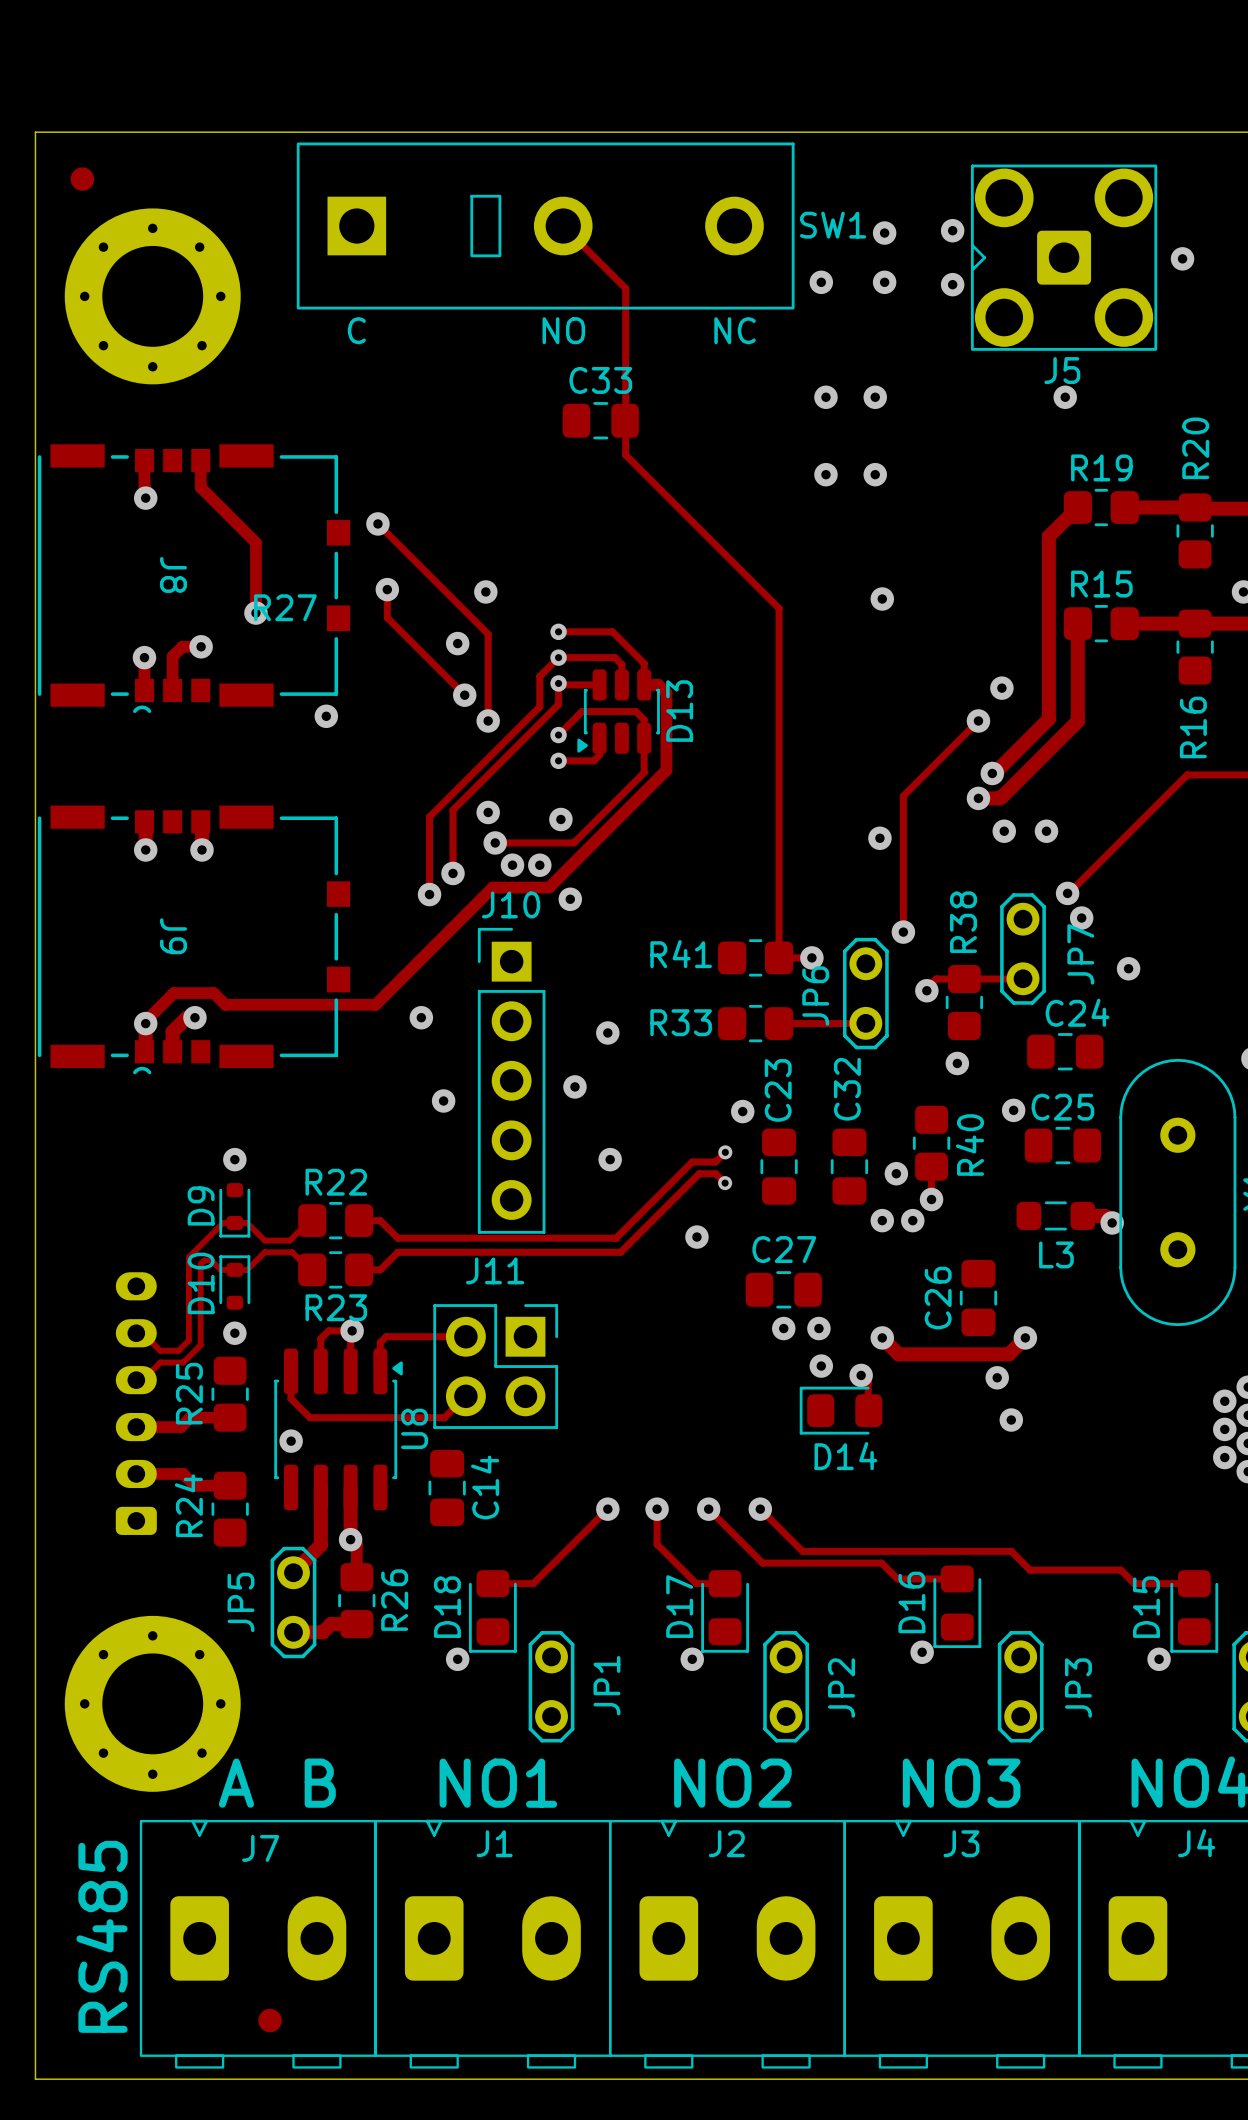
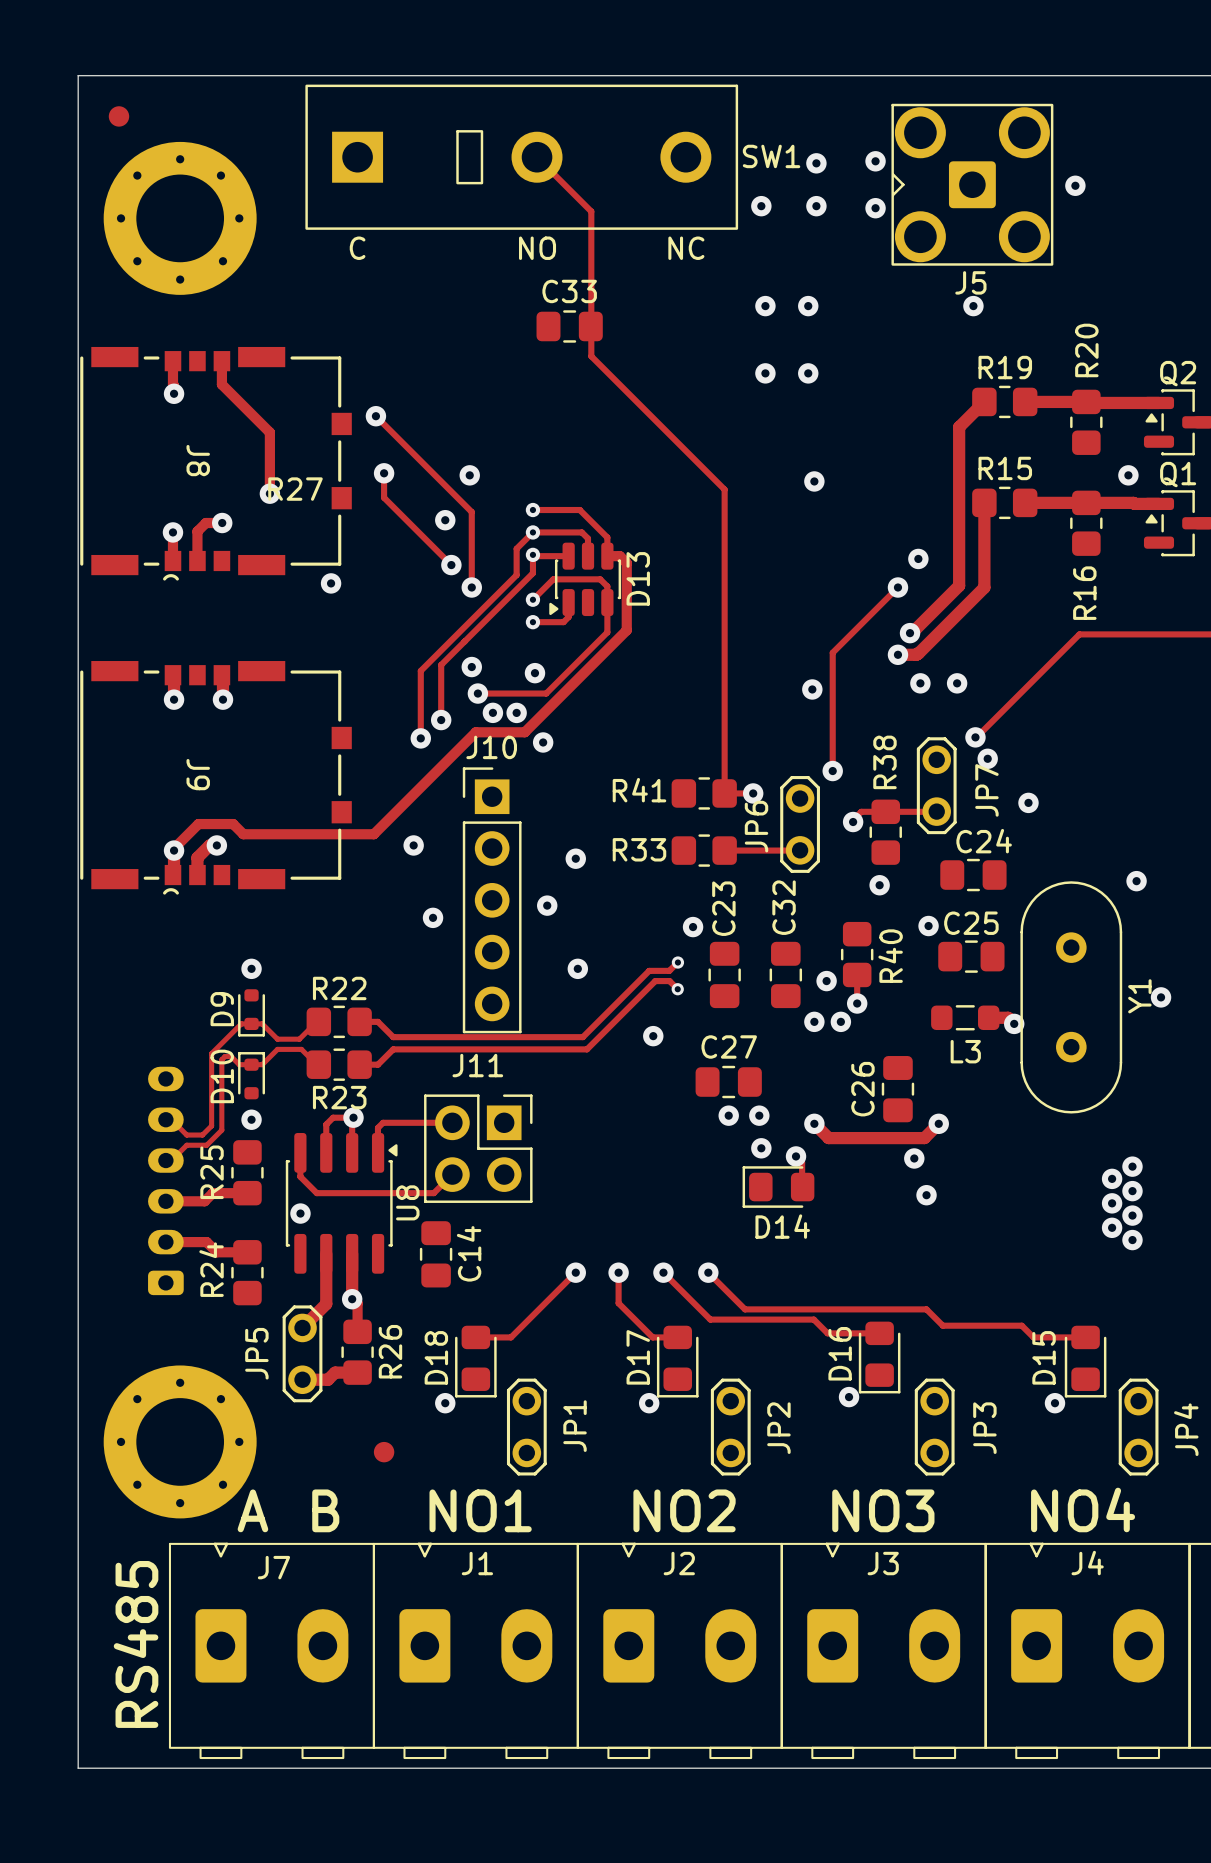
part position: (270, 2020) -> (384, 1452)

